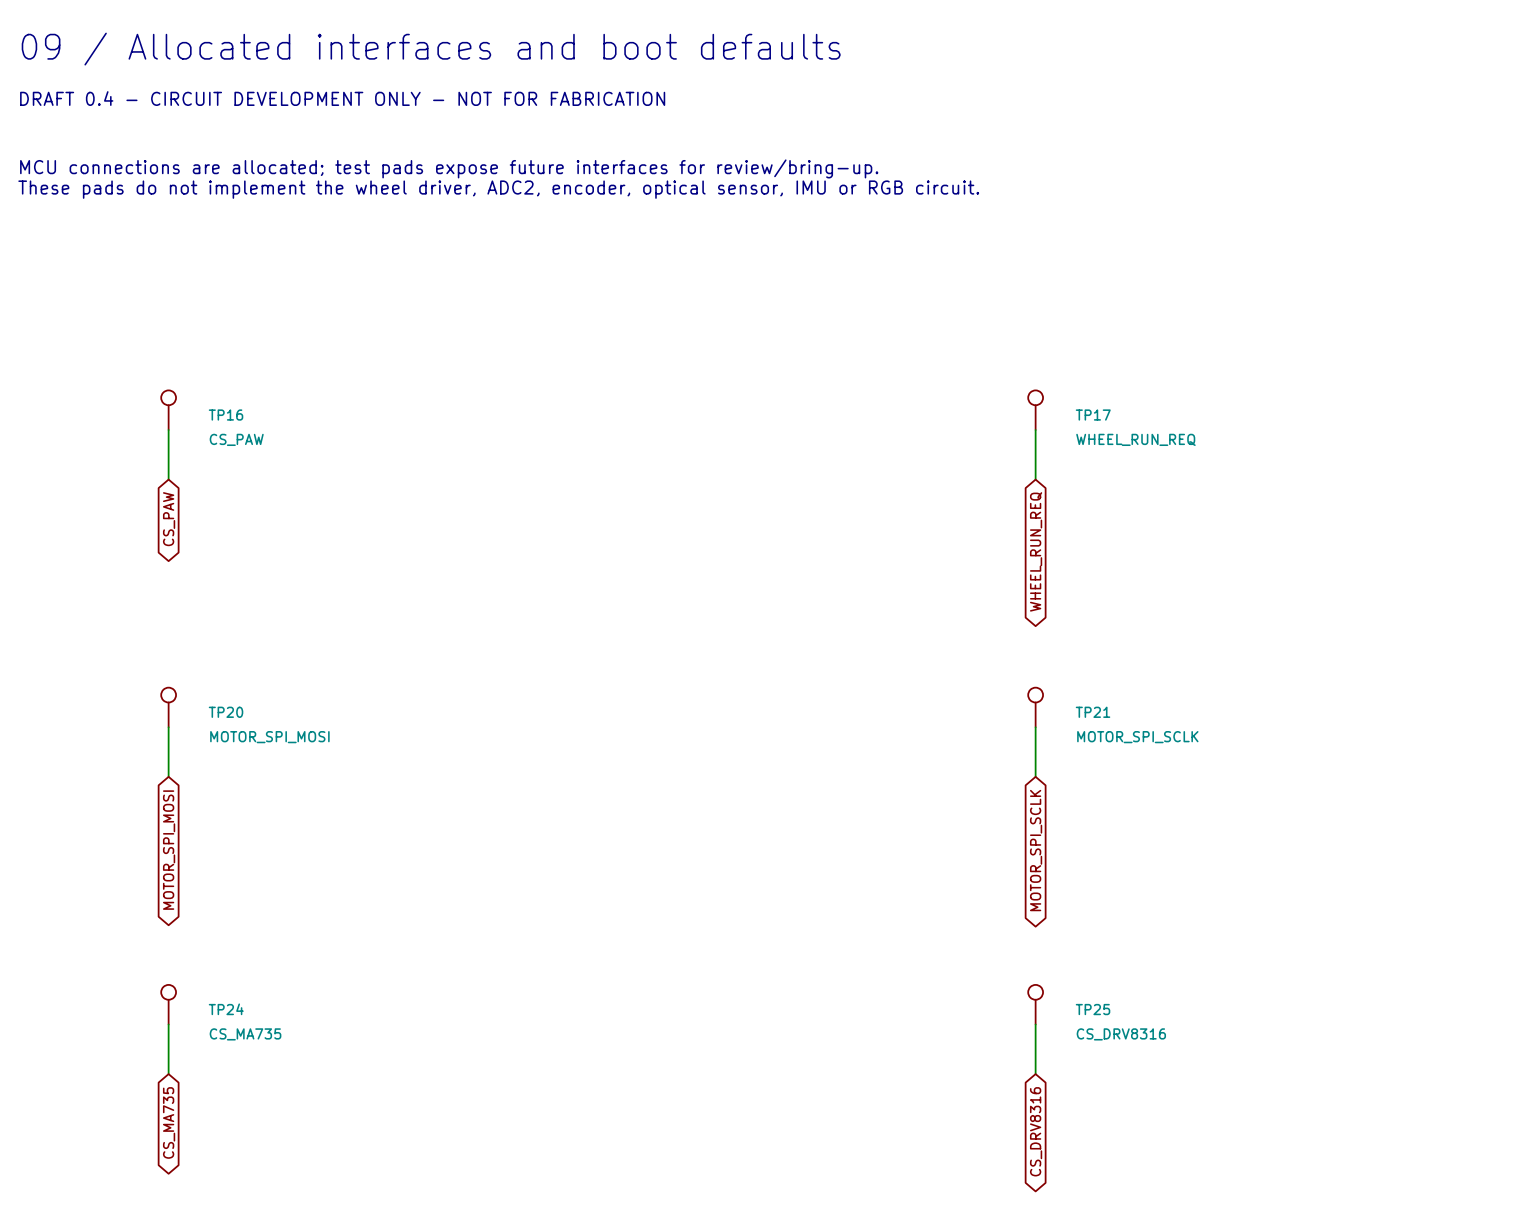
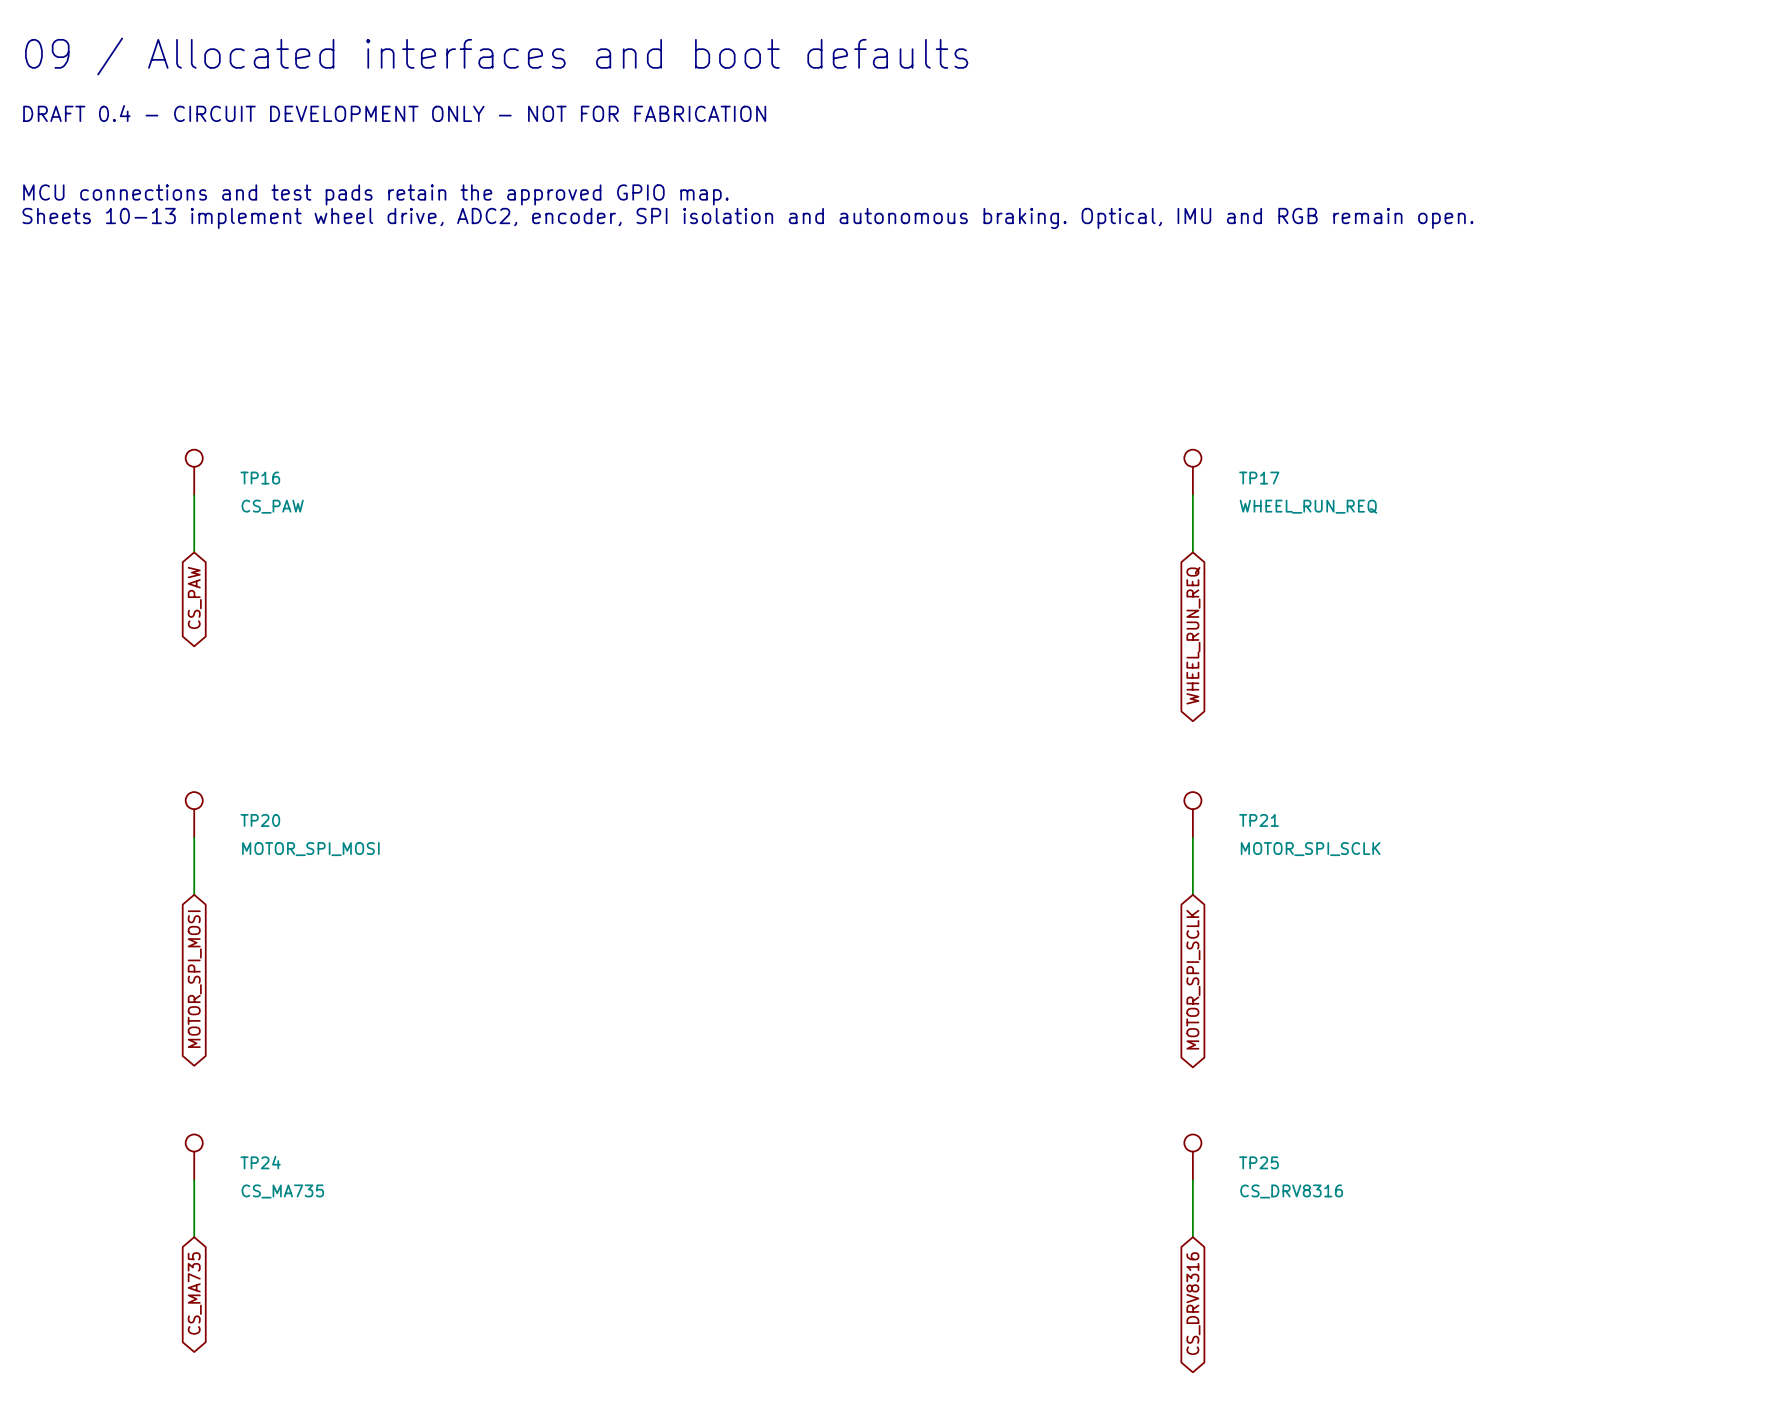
text: MCU connections are allocated; test pads expose future interfaces for review/bring-up. (449, 168) -> MCU connections and test pads retain the approved GPIO map. (375, 194)
text: These pads do not implement the wheel driver, ADC2, encoder, optical sensor, IMU or RGB circuit. (498, 189) -> Sheets 10-13 implement wheel drive, ADC2, encoder, SPI isolation and autonomous braking. Optical, IMU and RGB remain open. (747, 218)

